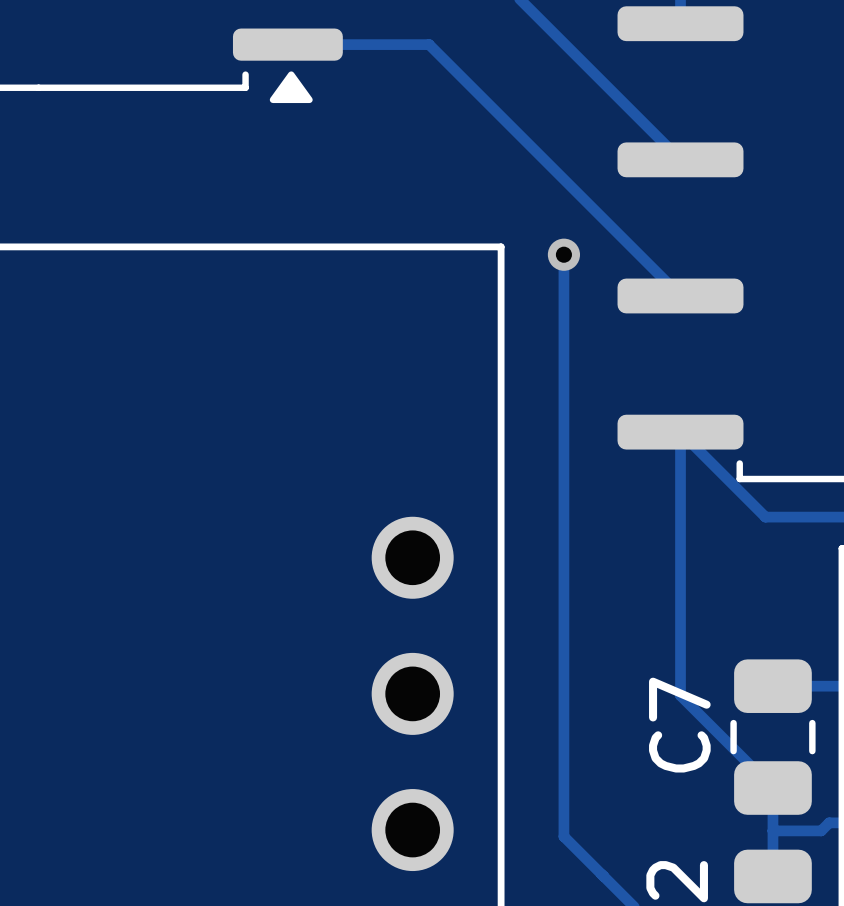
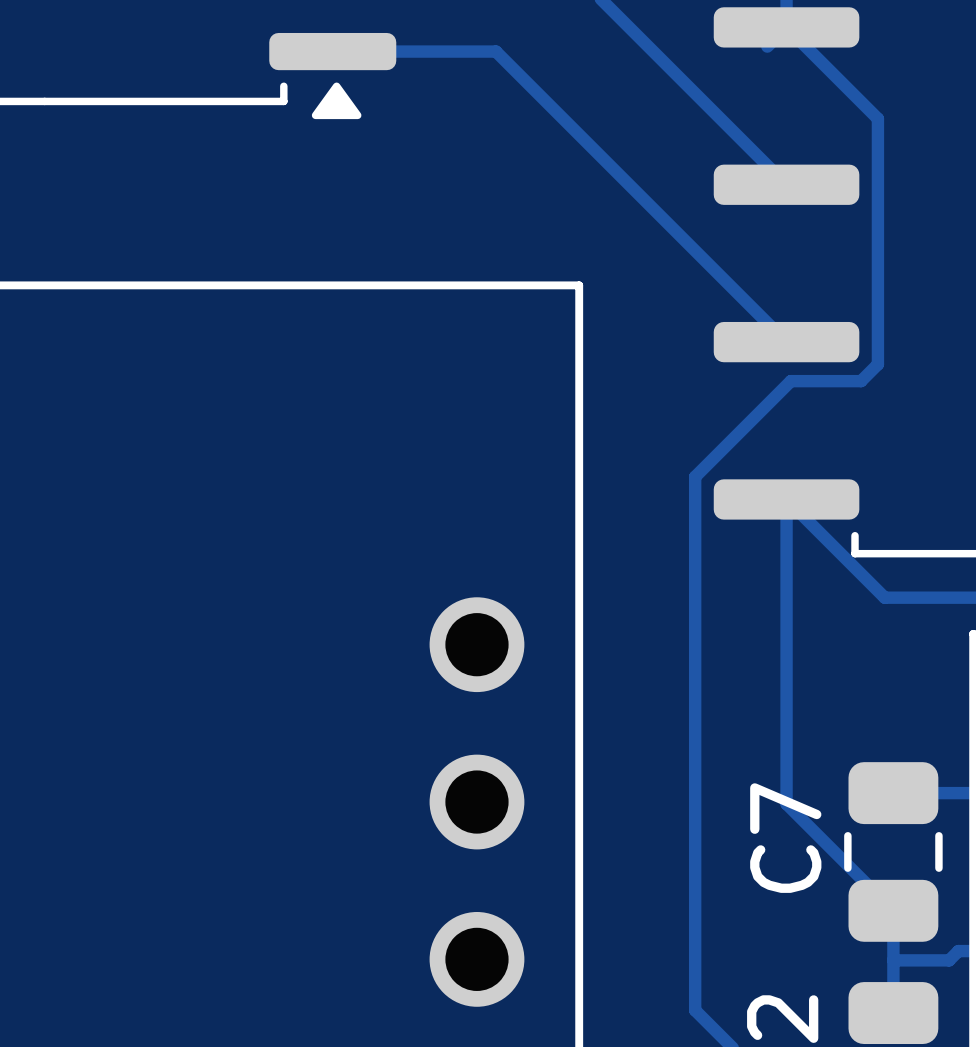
track: (563, 254) (563, 836) (601, 874) -> (767, 46) (786, 27) (877, 118) (877, 364) (861, 381) (790, 381) (695, 476) (695, 1010)
via: (563, 254) -> none

